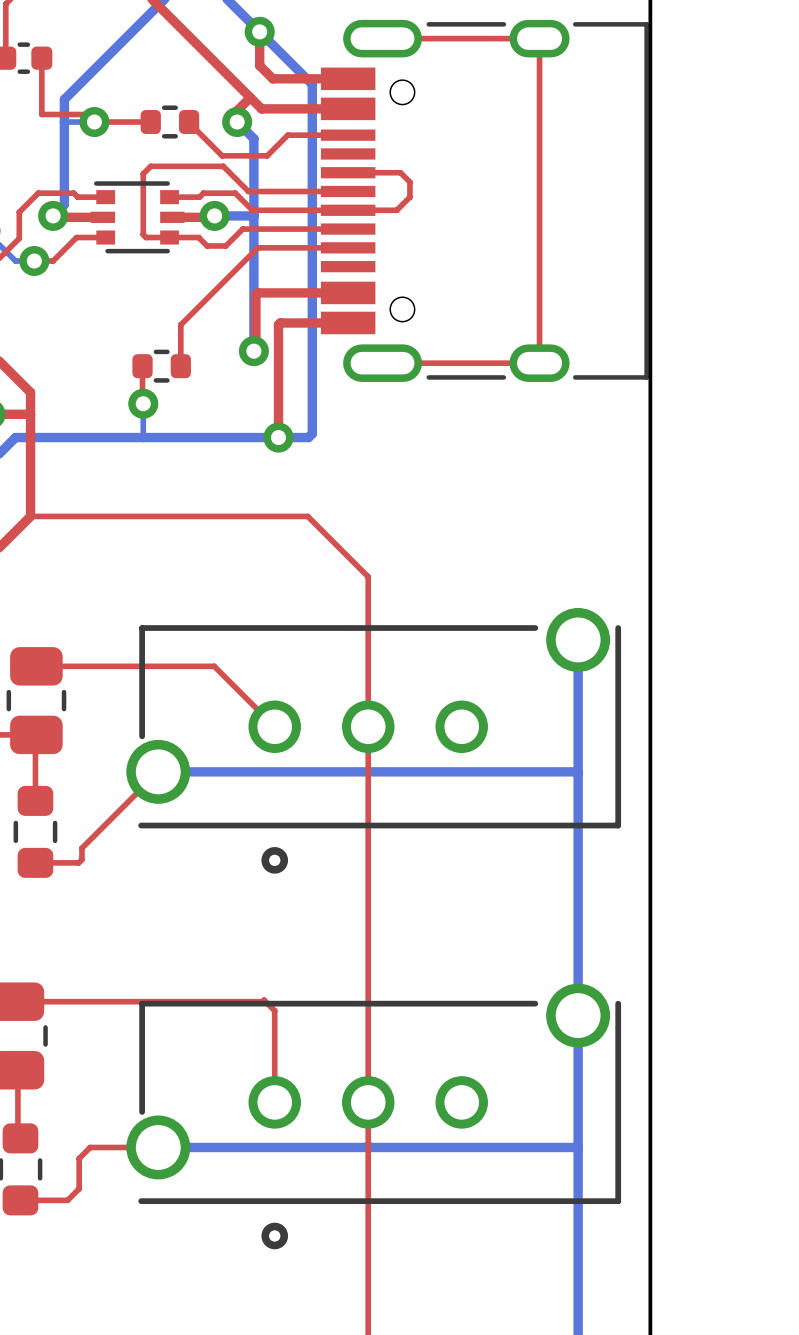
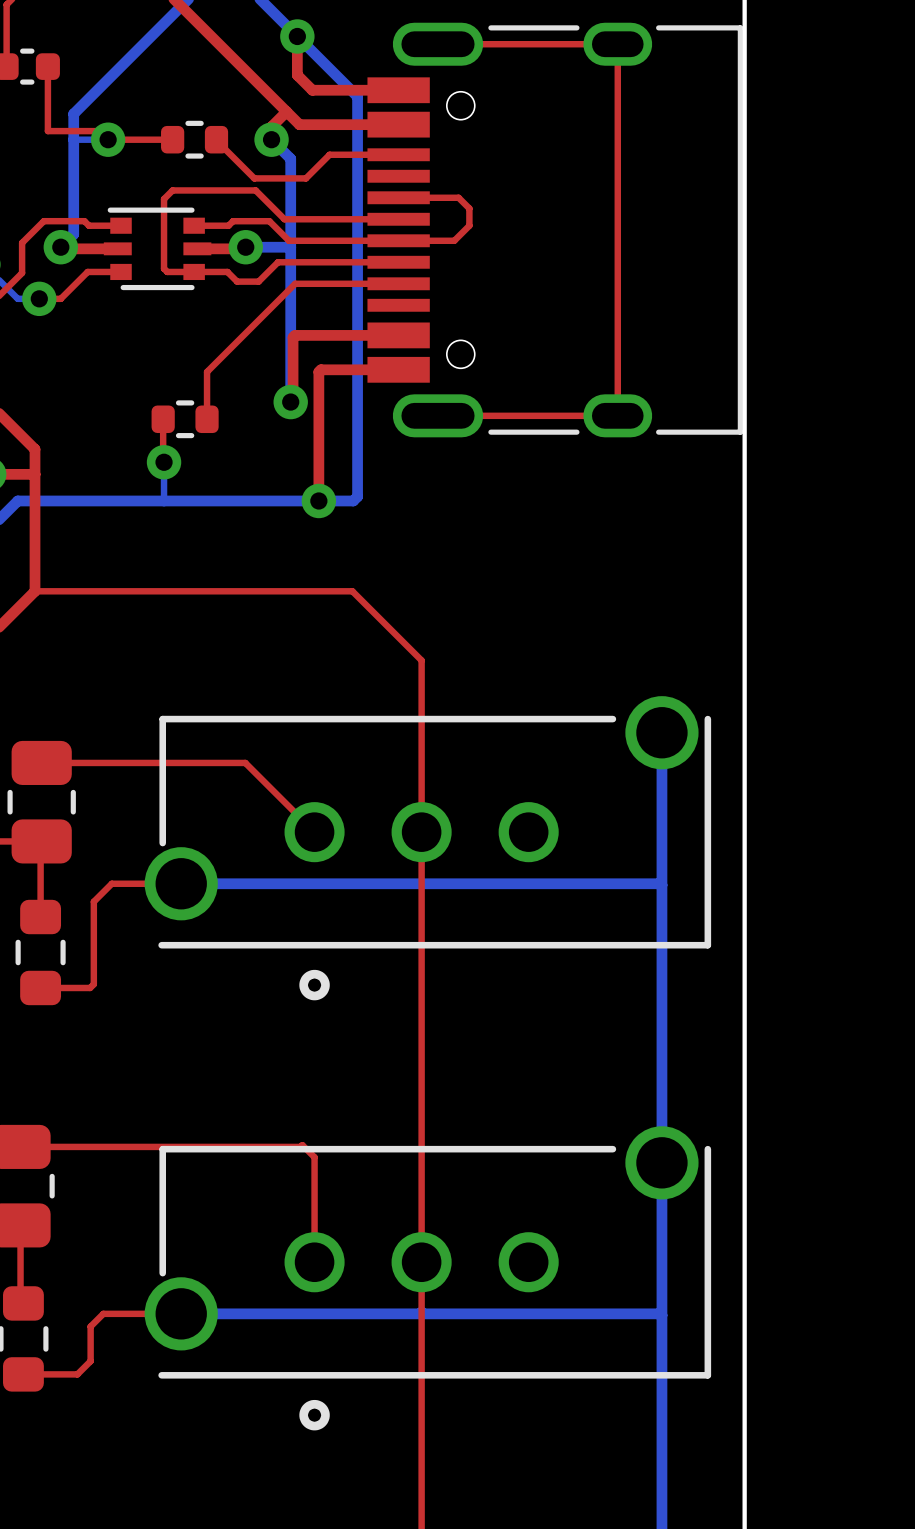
top track: (158, 771) (81, 848) -> (181, 883) (111, 883) (93, 901) (93, 971)

